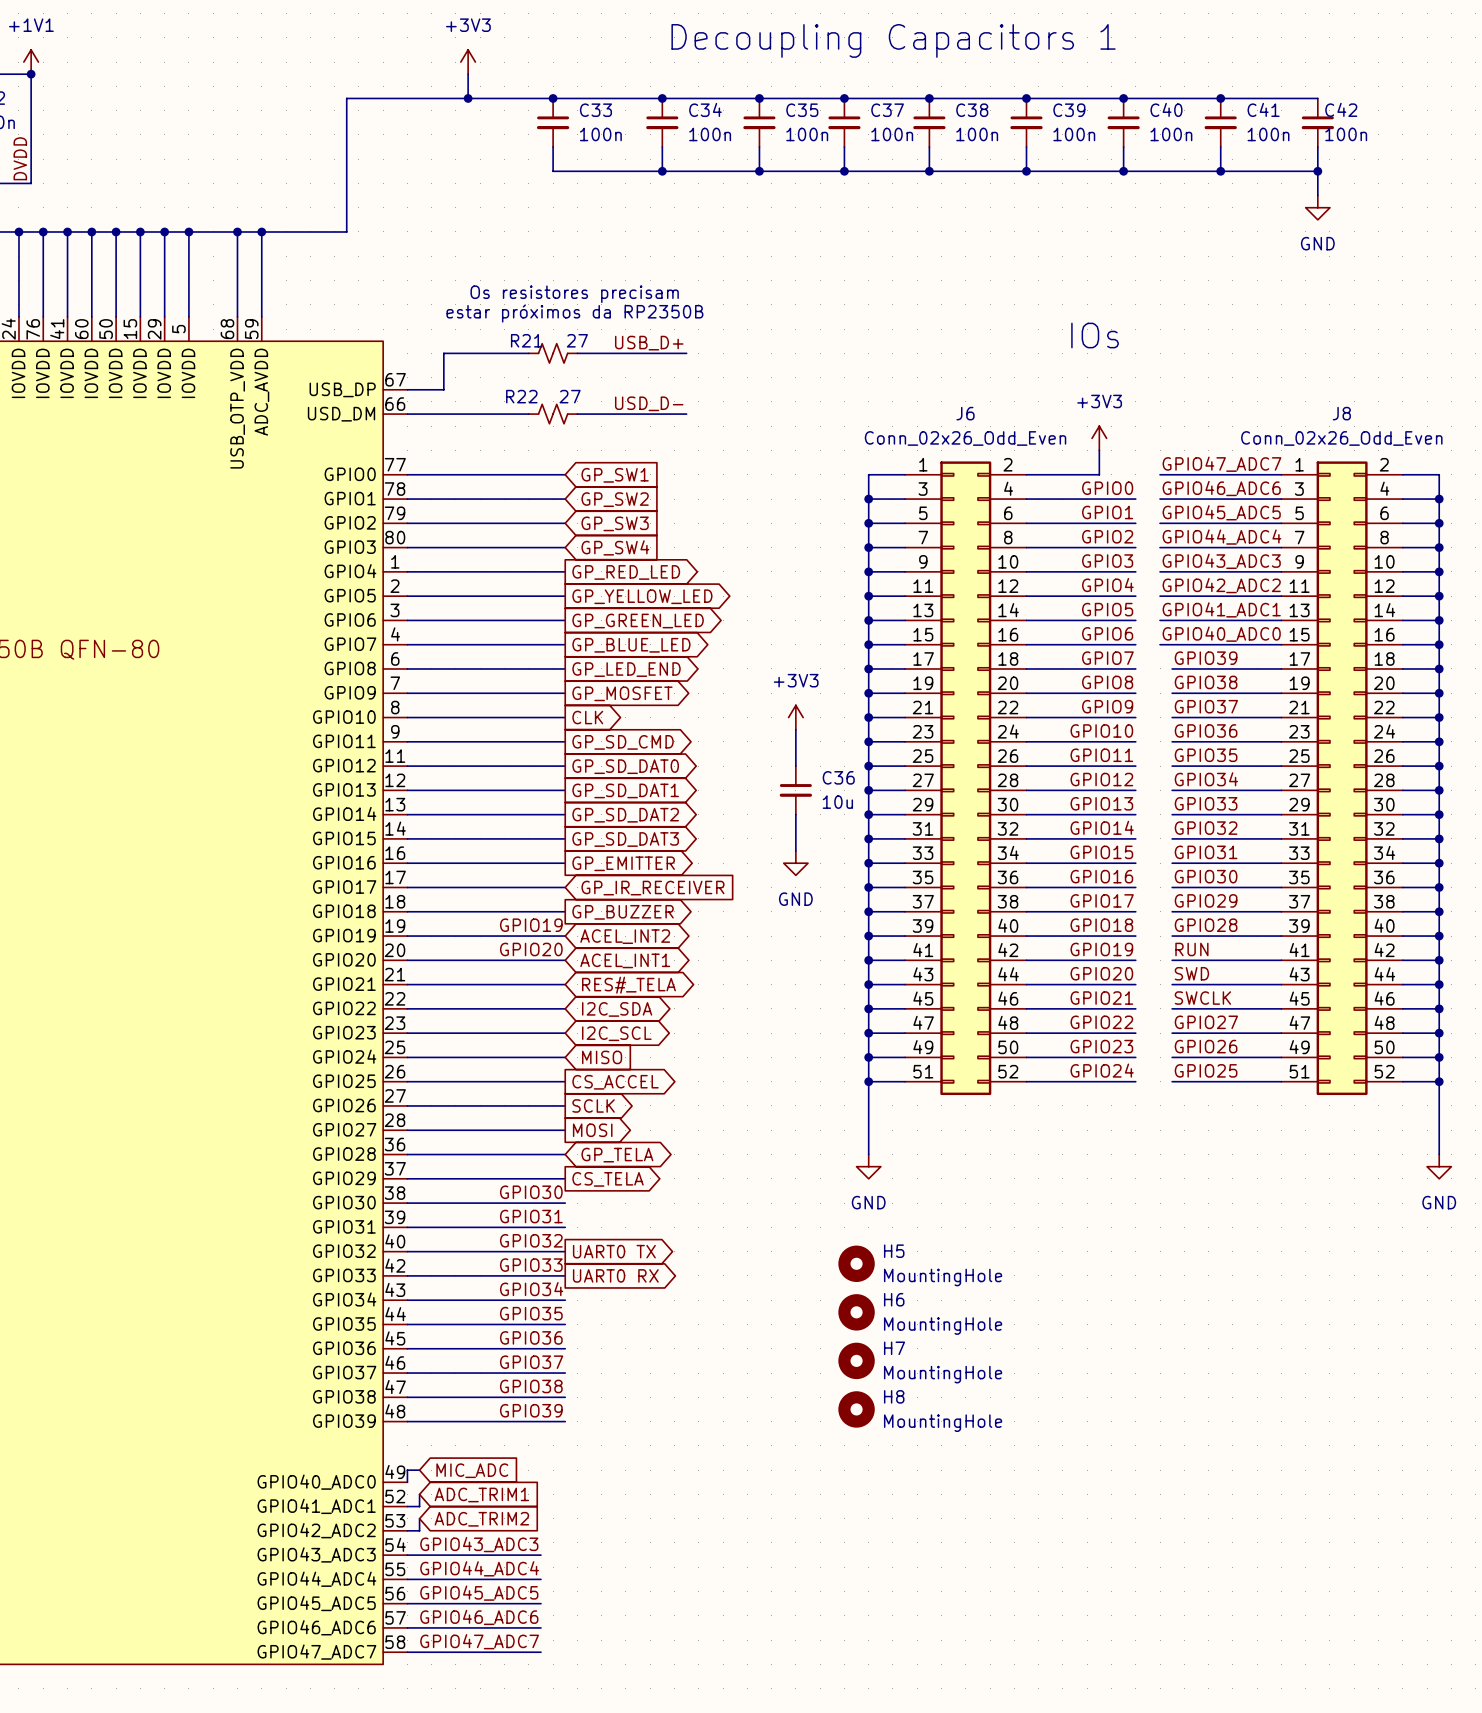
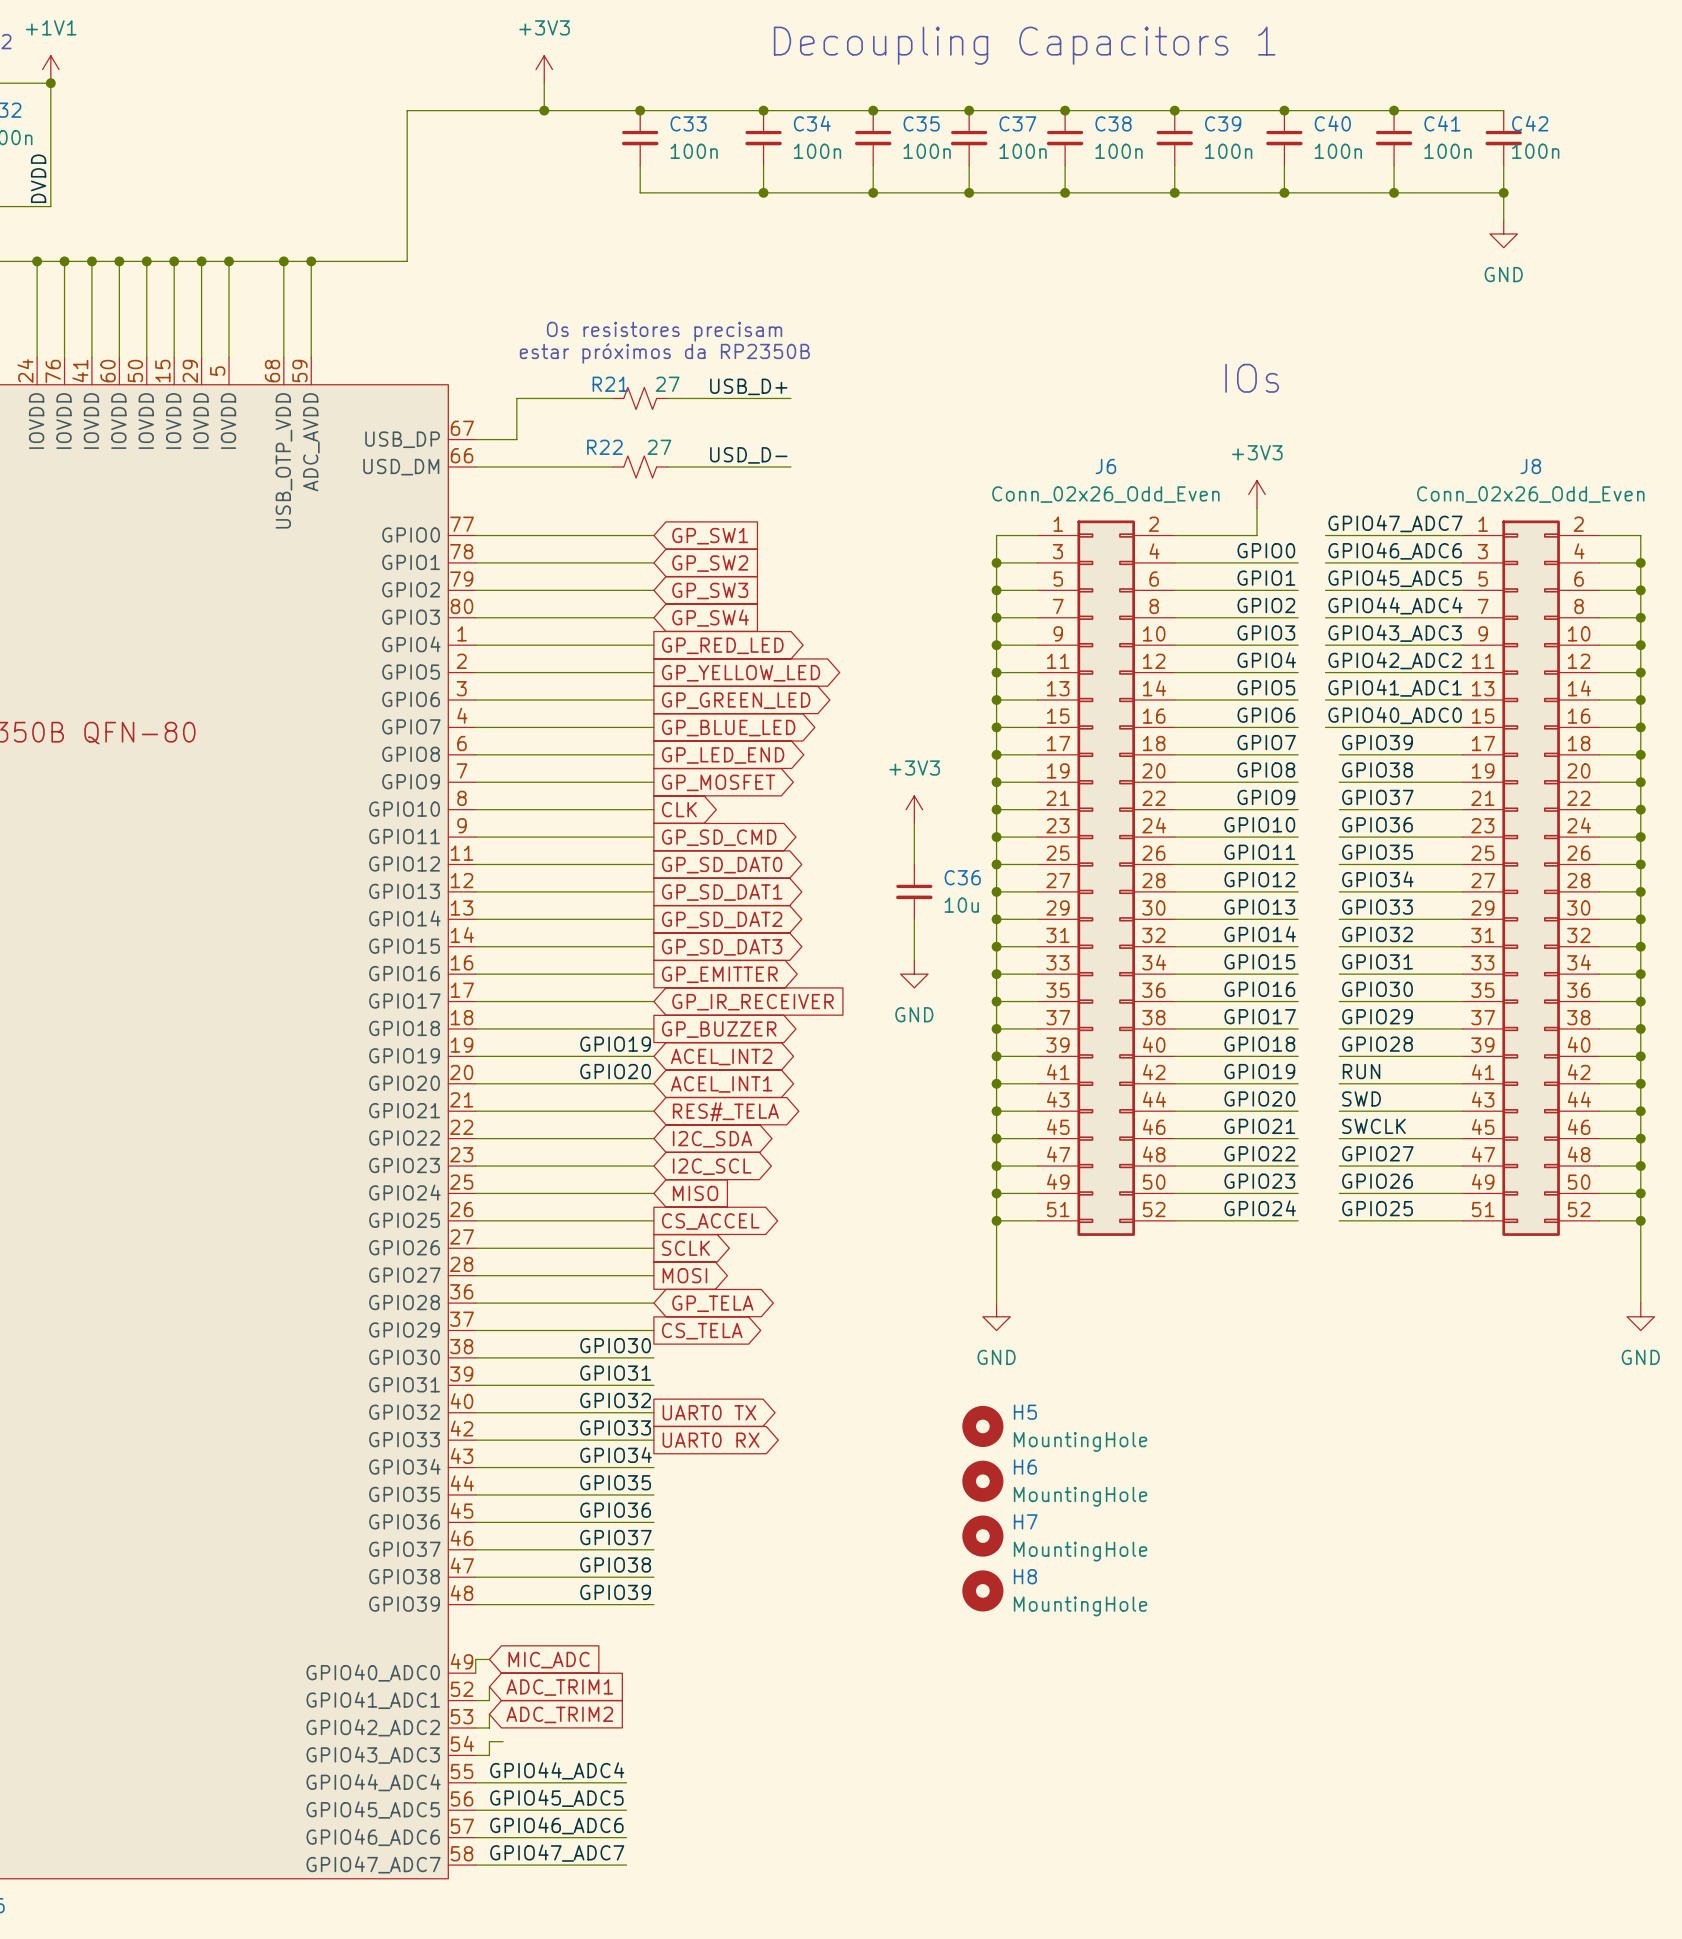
label: GPIO43_ADC3 (479, 1544) -> none
wire: (419, 1555) (540, 1555) -> (489, 1755) (489, 1741) (503, 1741)

